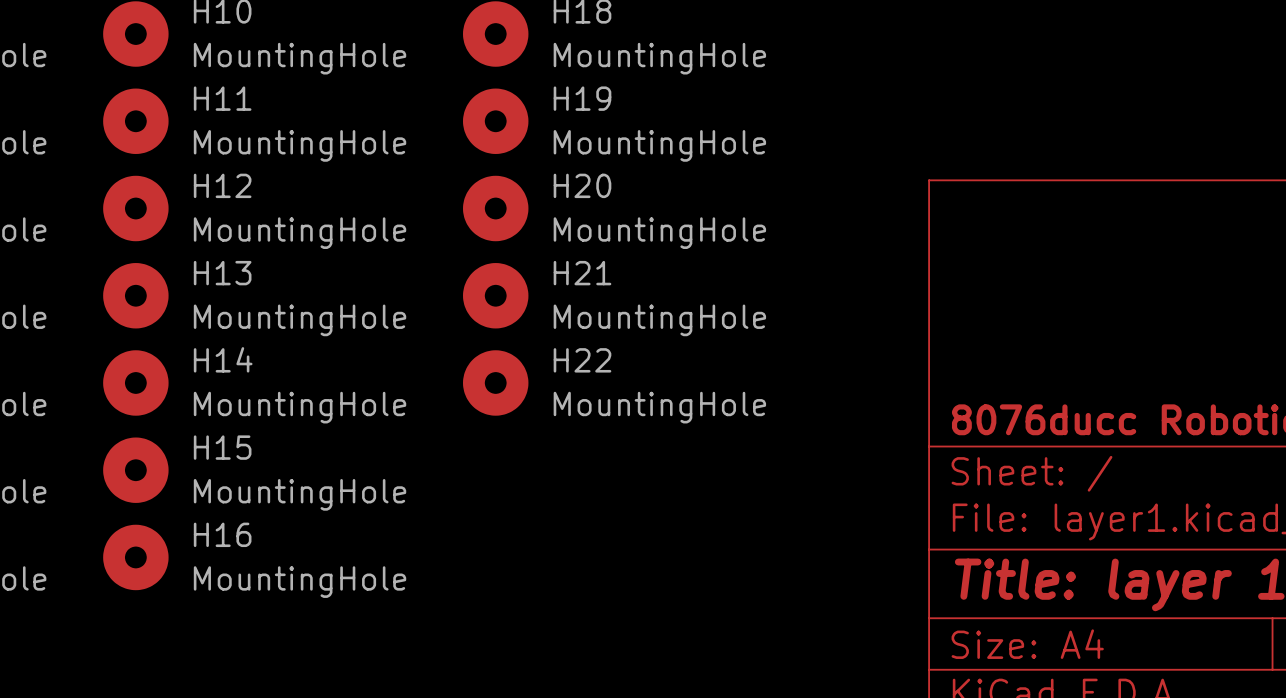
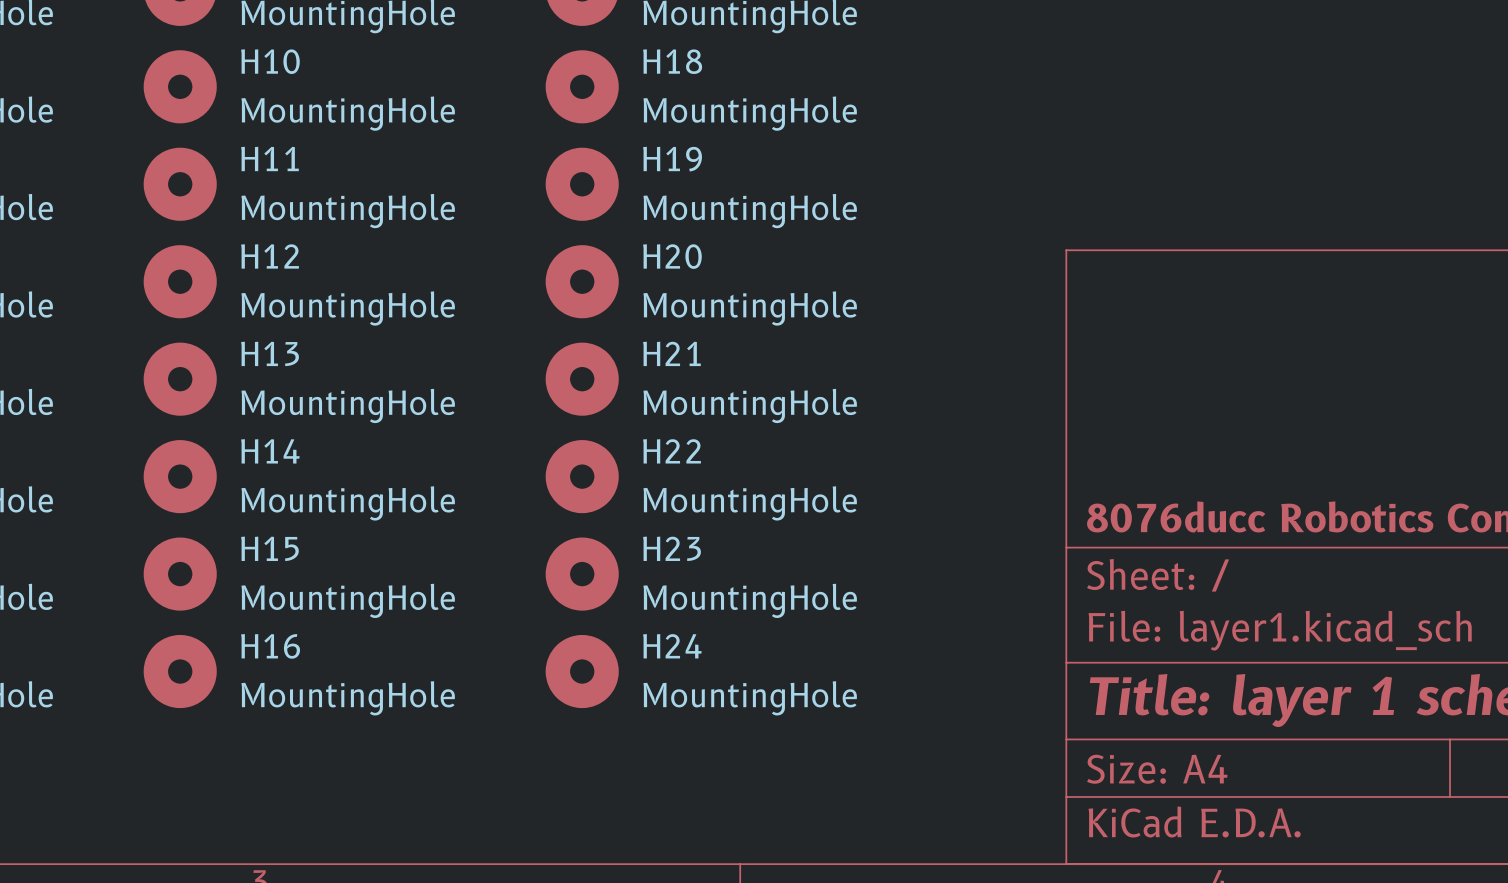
H23: none -> MountingHole (582, 574)
H24: none -> MountingHole (582, 671)

